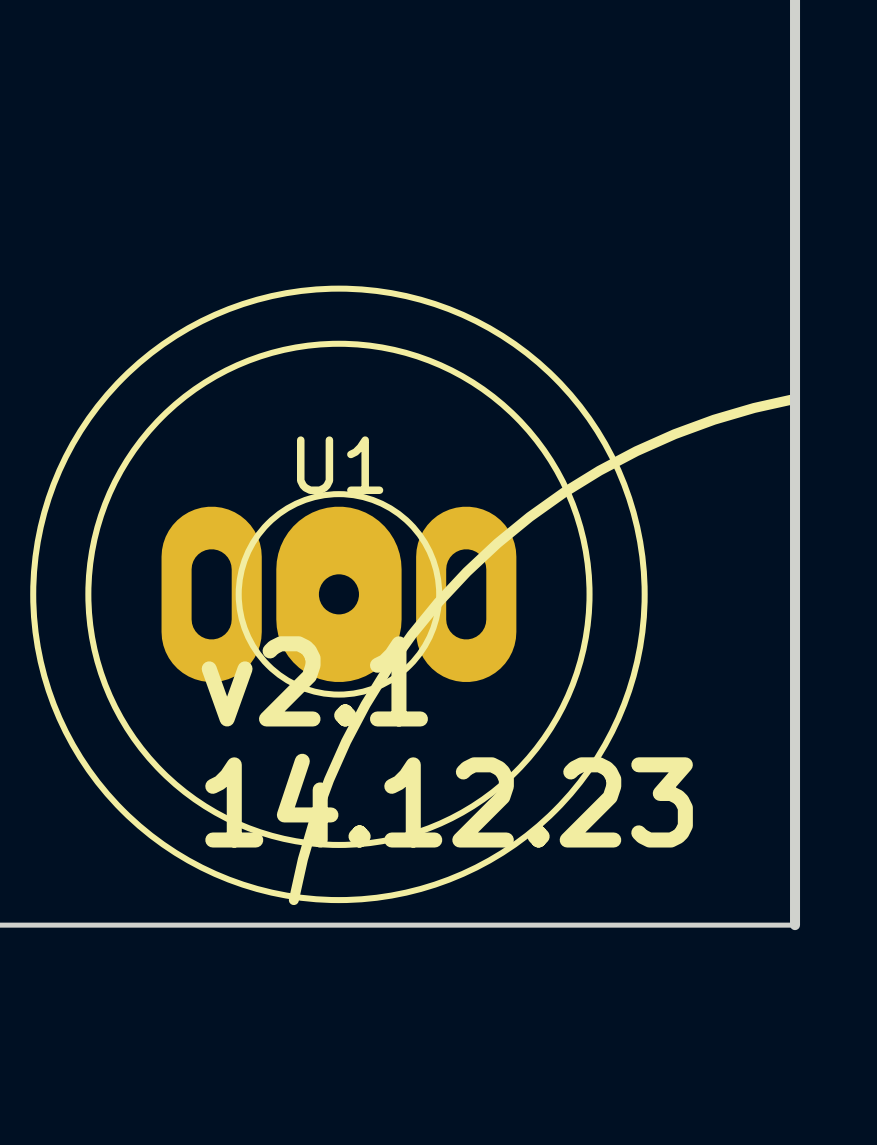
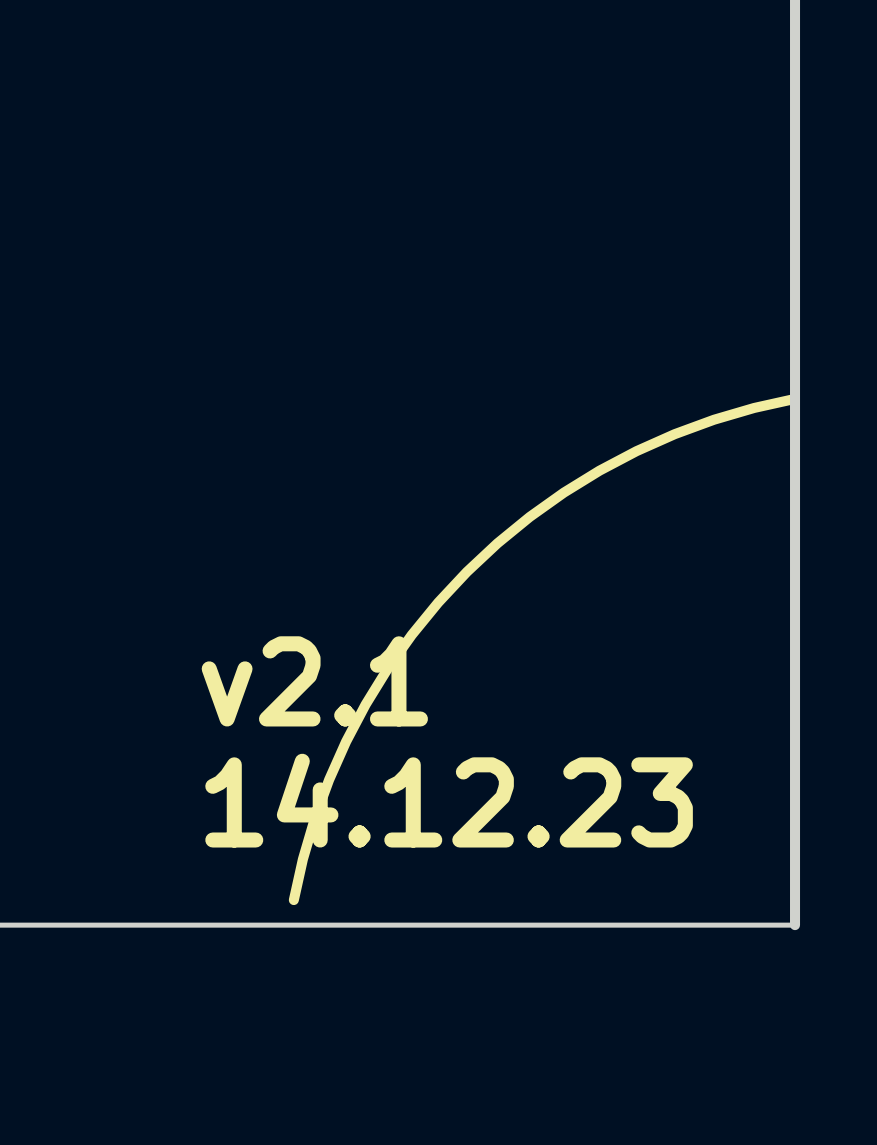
U1: (338, 594) -> none

